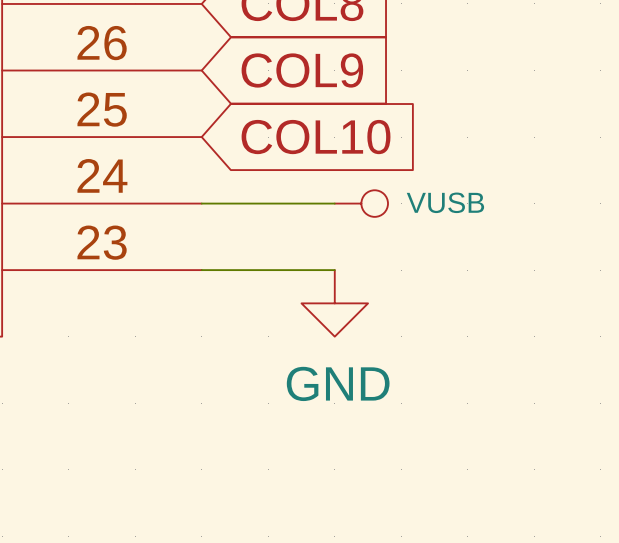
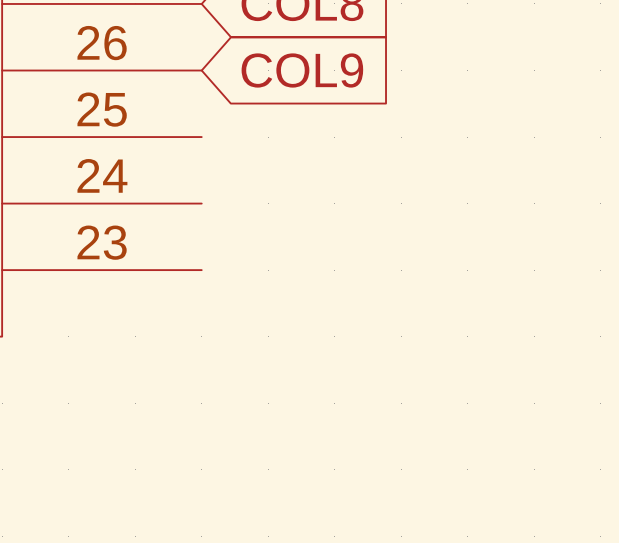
global label: COL10 (316, 137) -> none
wire: (201, 203) (334, 203) -> none
power symbol: VUSB (361, 203) -> none
wire: (201, 270) (334, 270) -> none
power symbol: GND (334, 303) -> none

